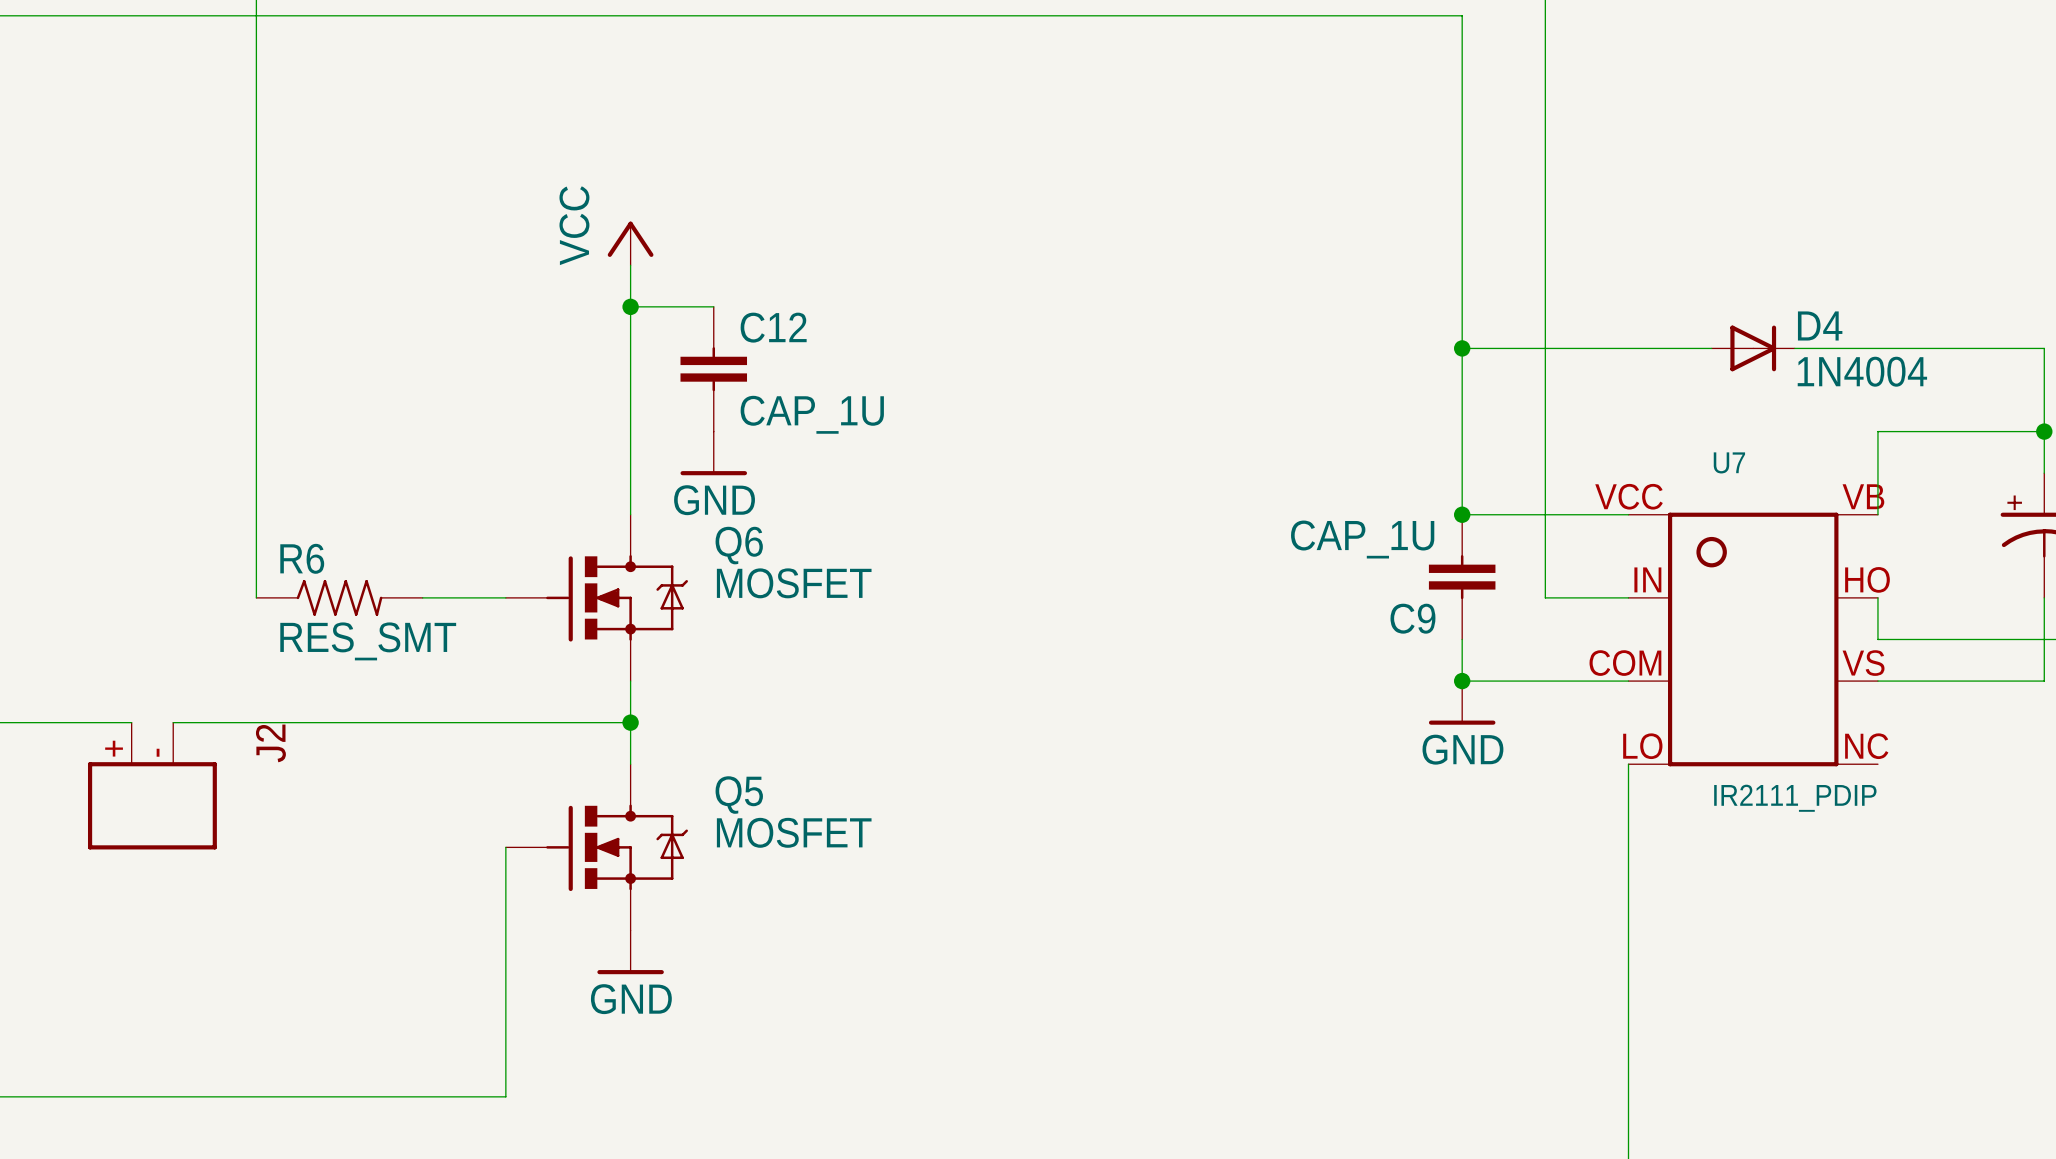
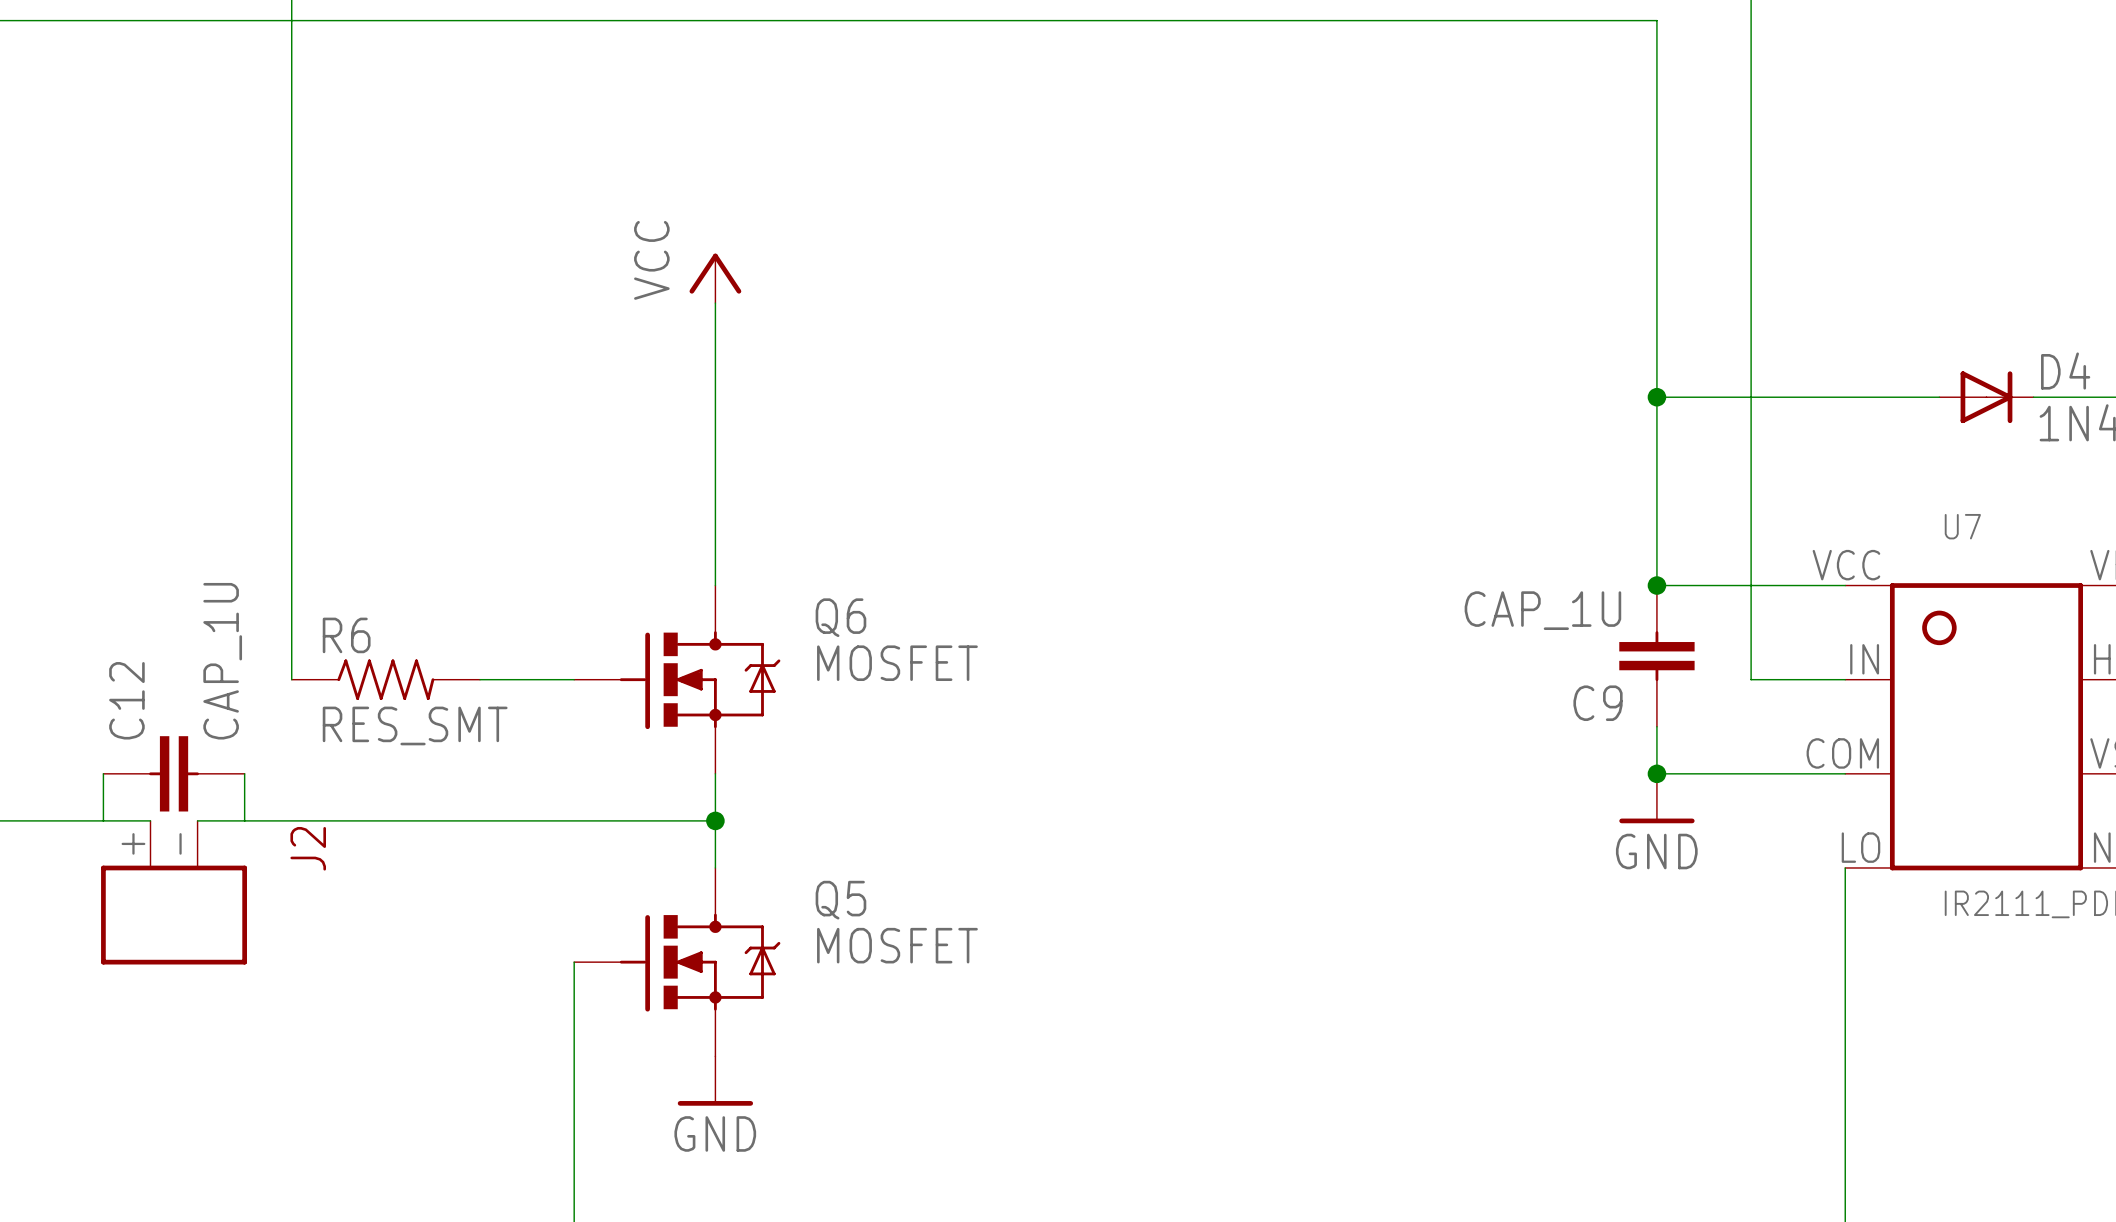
wire: (630, 306) (713, 306) -> none
junction: (630, 306) -> none
C12 name position: C12 (773, 327) -> C12 (126, 700)
C12 rotation: 0° (713, 369) -> 90° clockwise (174, 773)
C12 position: (713, 369) -> (174, 773)
C12 value position: CAP_1U (812, 414) -> CAP_1U (222, 661)
power symbol: GND (713, 453) -> none
wire: none -> (103, 773) (103, 820)
wire: none -> (244, 773) (244, 820)

